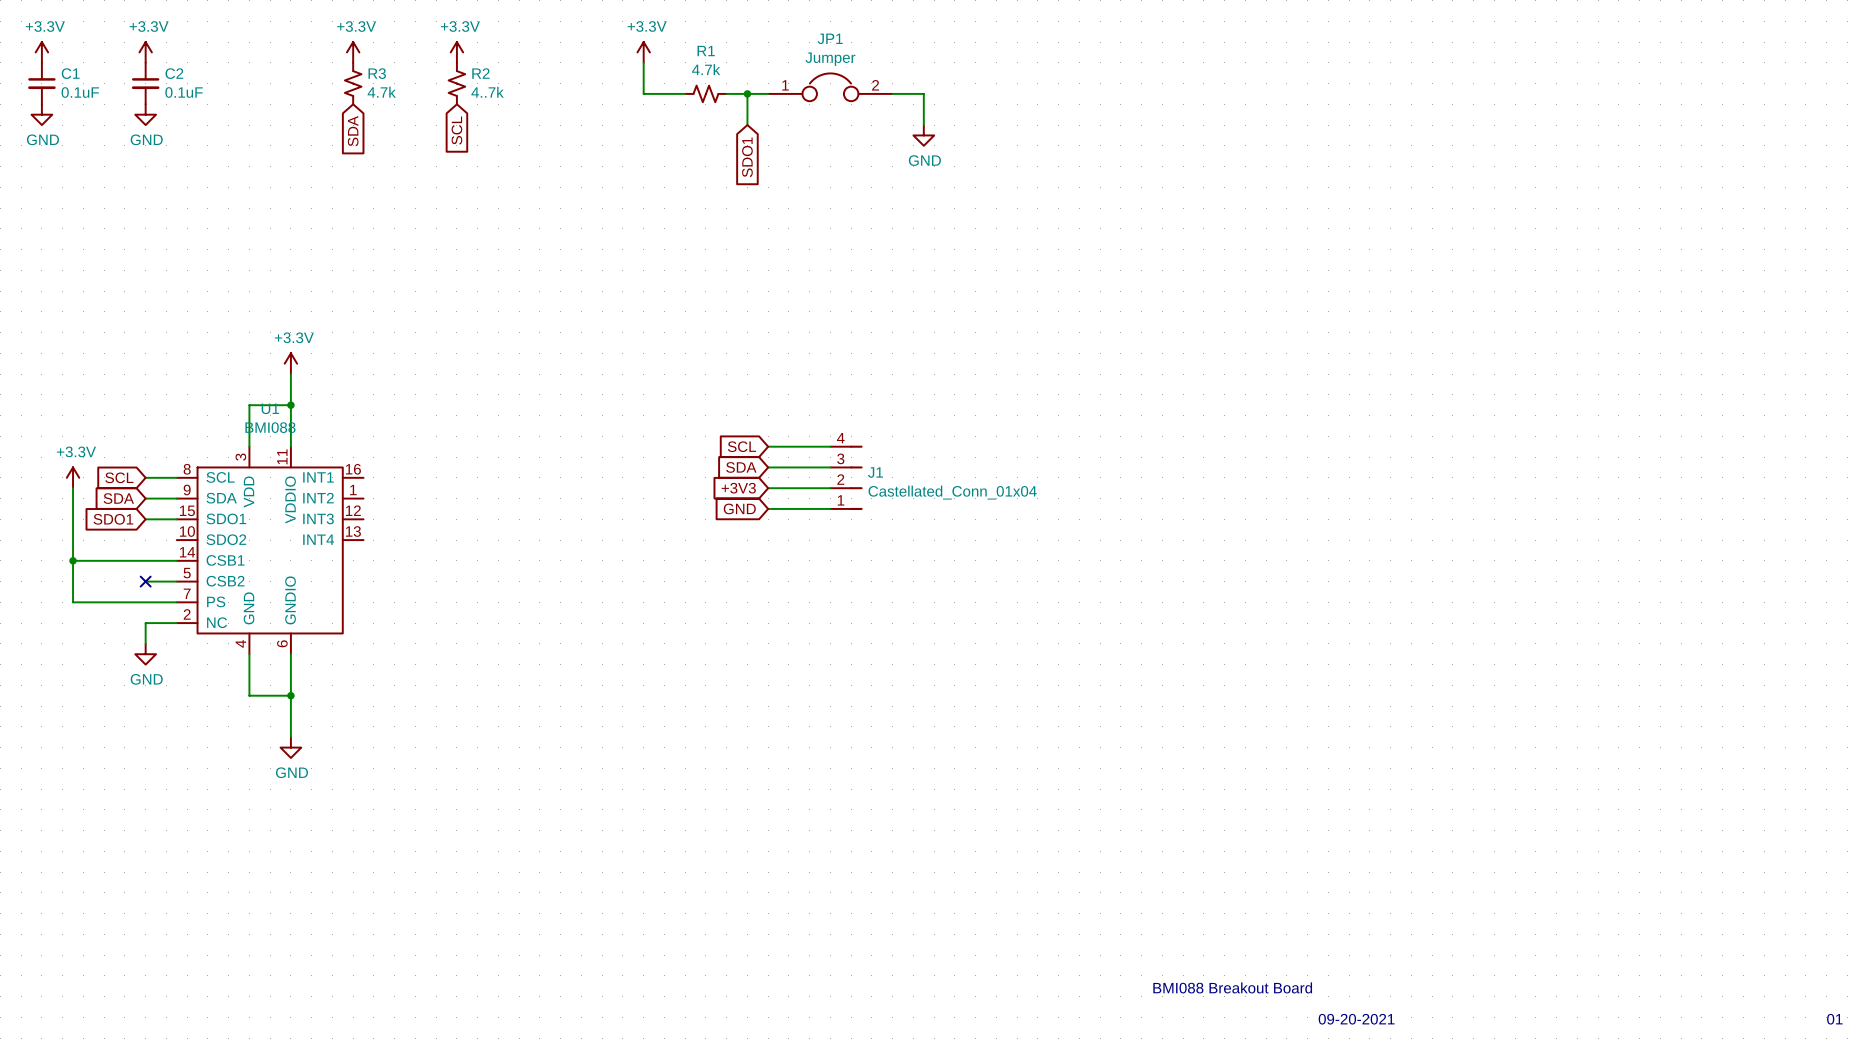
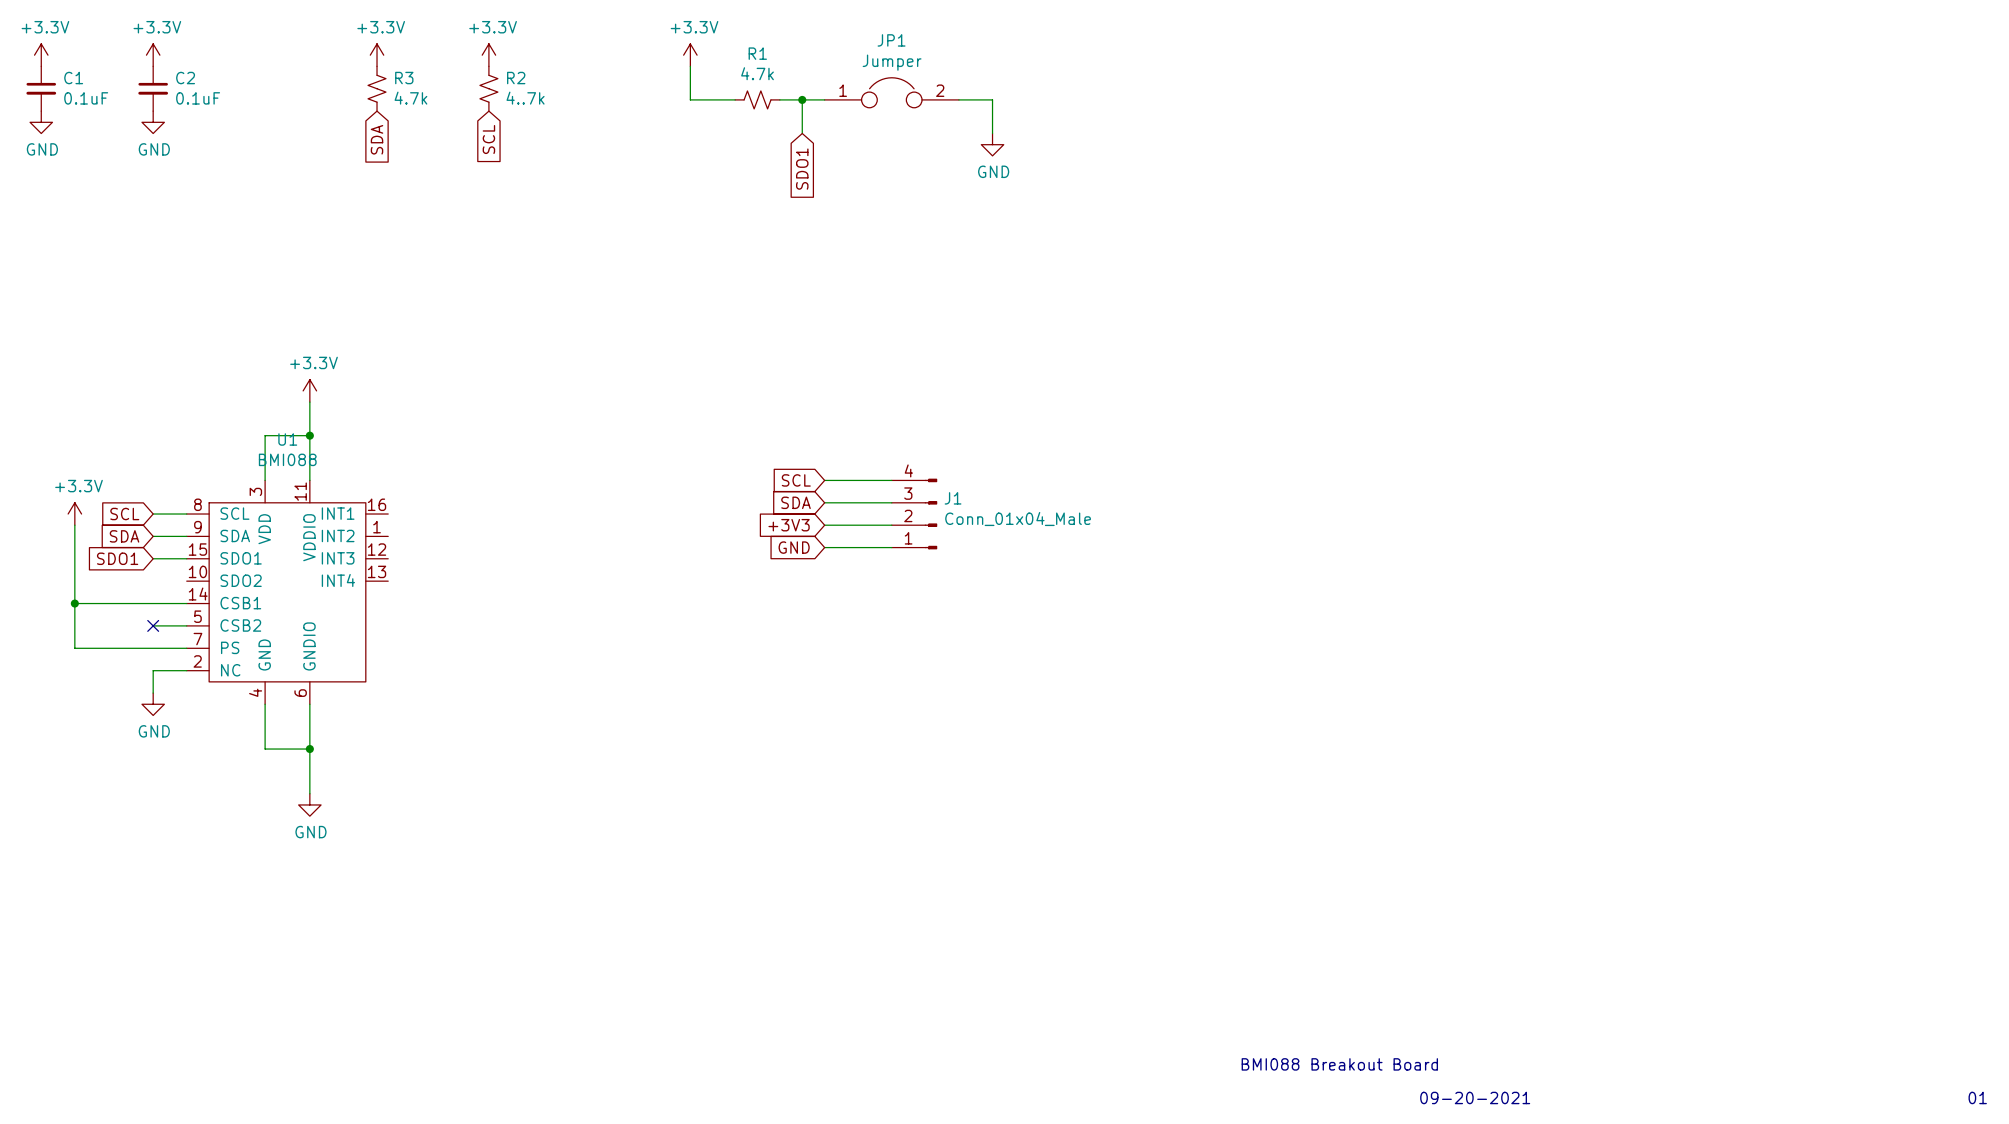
J1 symbol: [830, 445, 863, 510] -> [891, 478, 938, 550]
J1 value: Castellated_Conn_01x04 (952, 492) -> Conn_01x04_Male (1018, 519)

